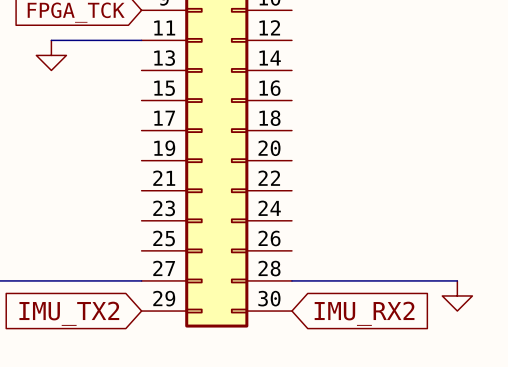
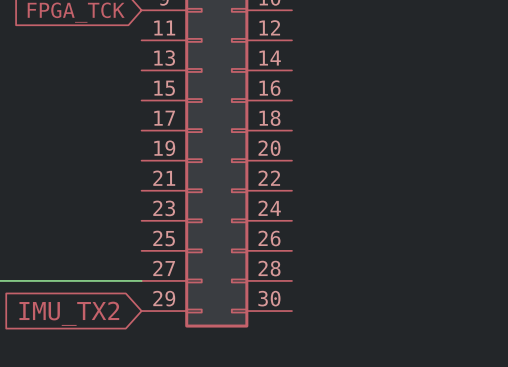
wire: (51, 40) (141, 40) -> none
power symbol: (51, 55) -> none
wire: (291, 280) (457, 280) -> none
power symbol: (457, 295) -> none
global label: IMU_RX2 (364, 313) -> none

